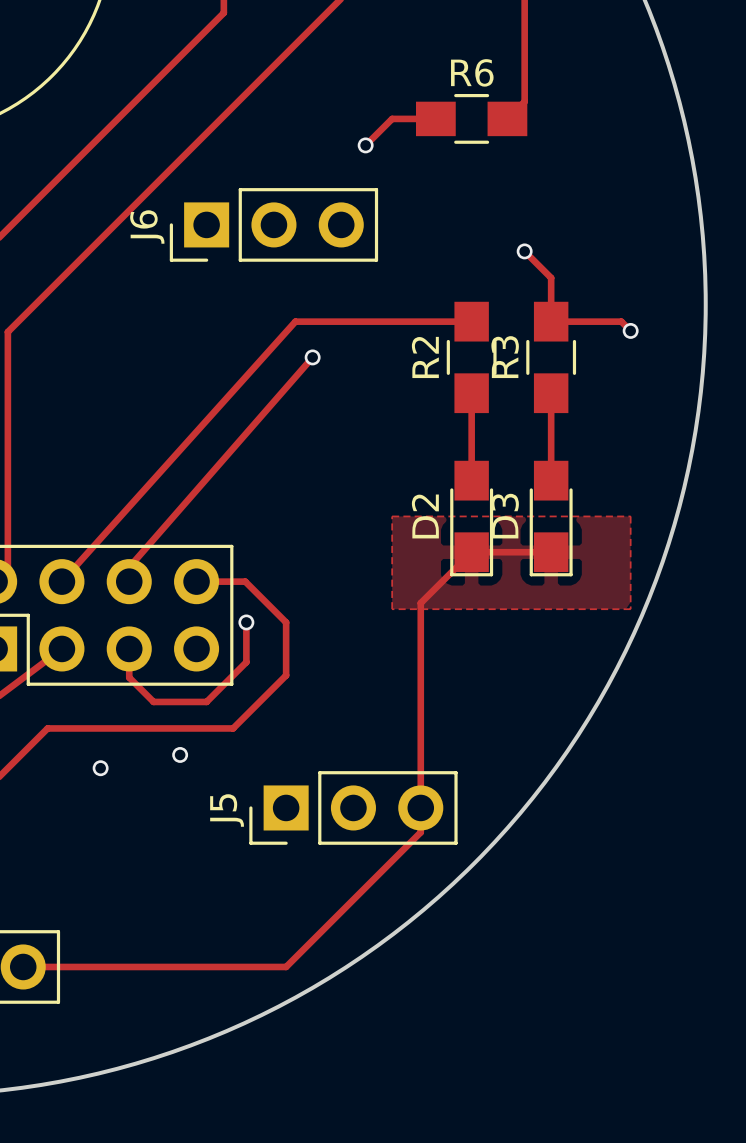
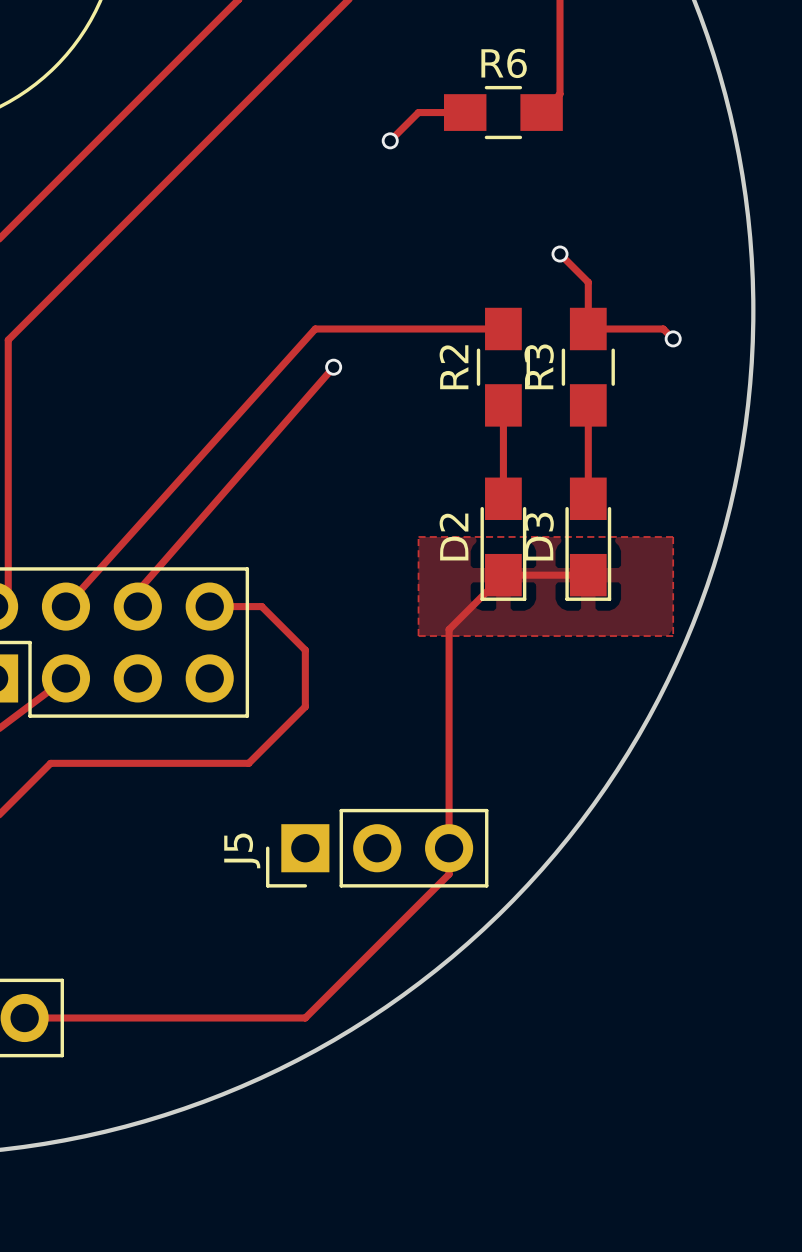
J6: (273, 224) -> none
track: (246, 622) (246, 662) (206, 701) (153, 701) (129, 677) (129, 648) -> none
via: (246, 622) -> none
via: (180, 754) -> none
via: (100, 768) -> none

